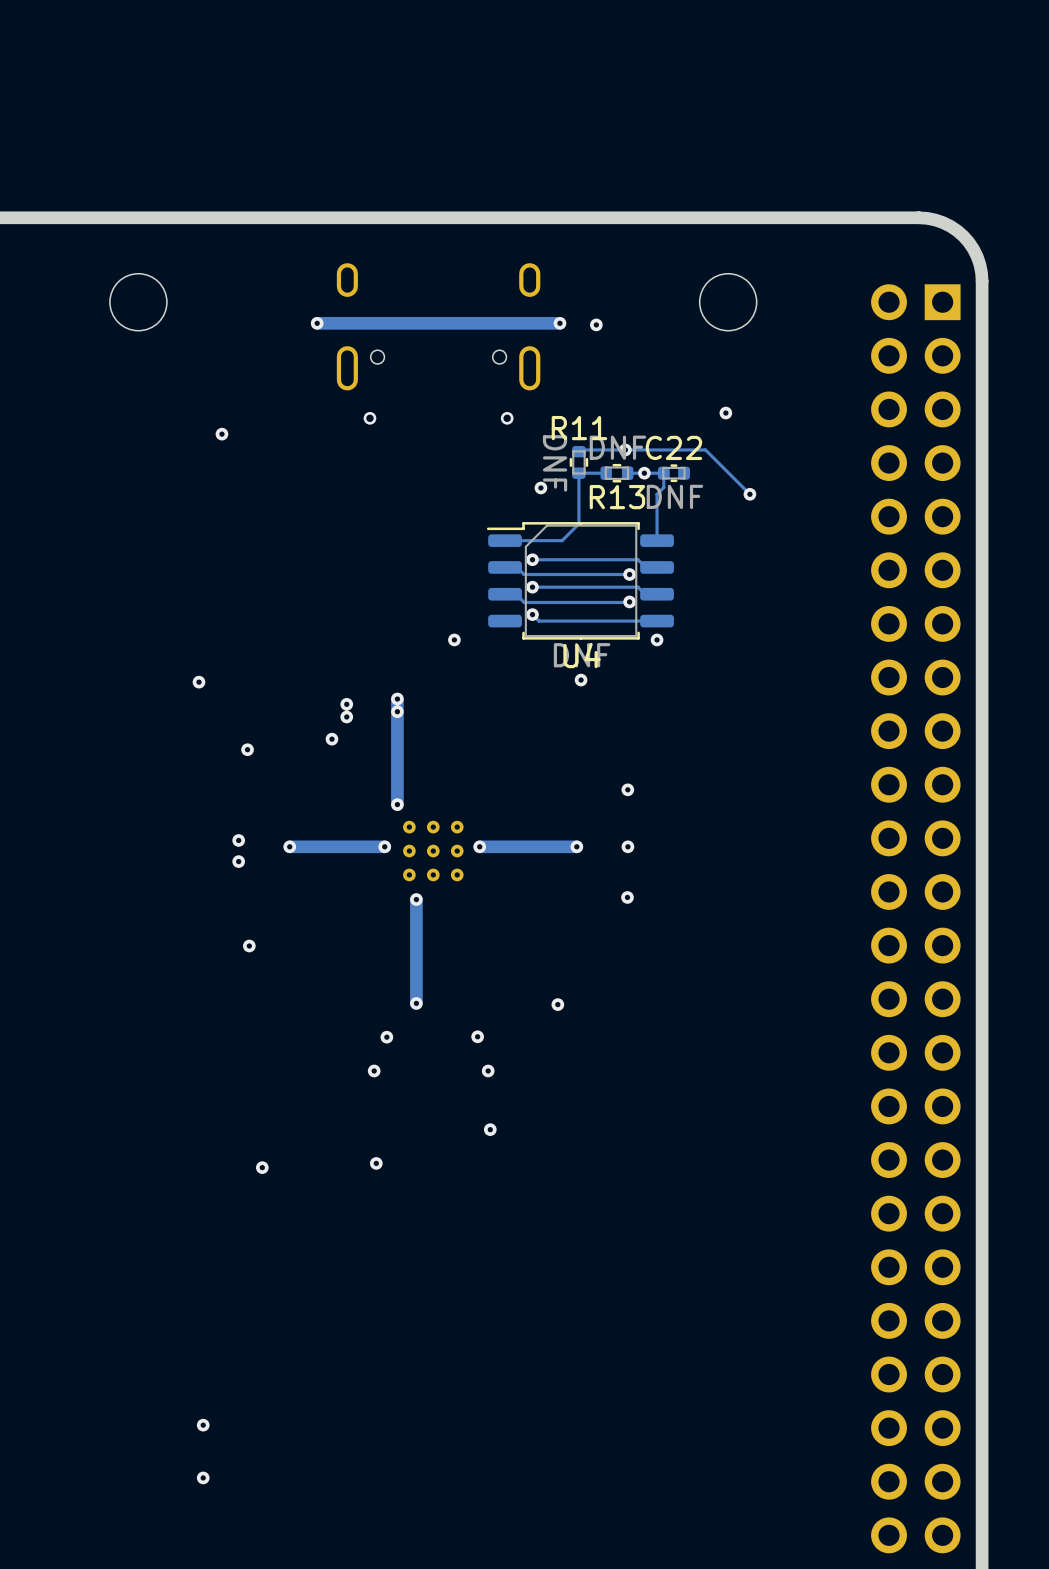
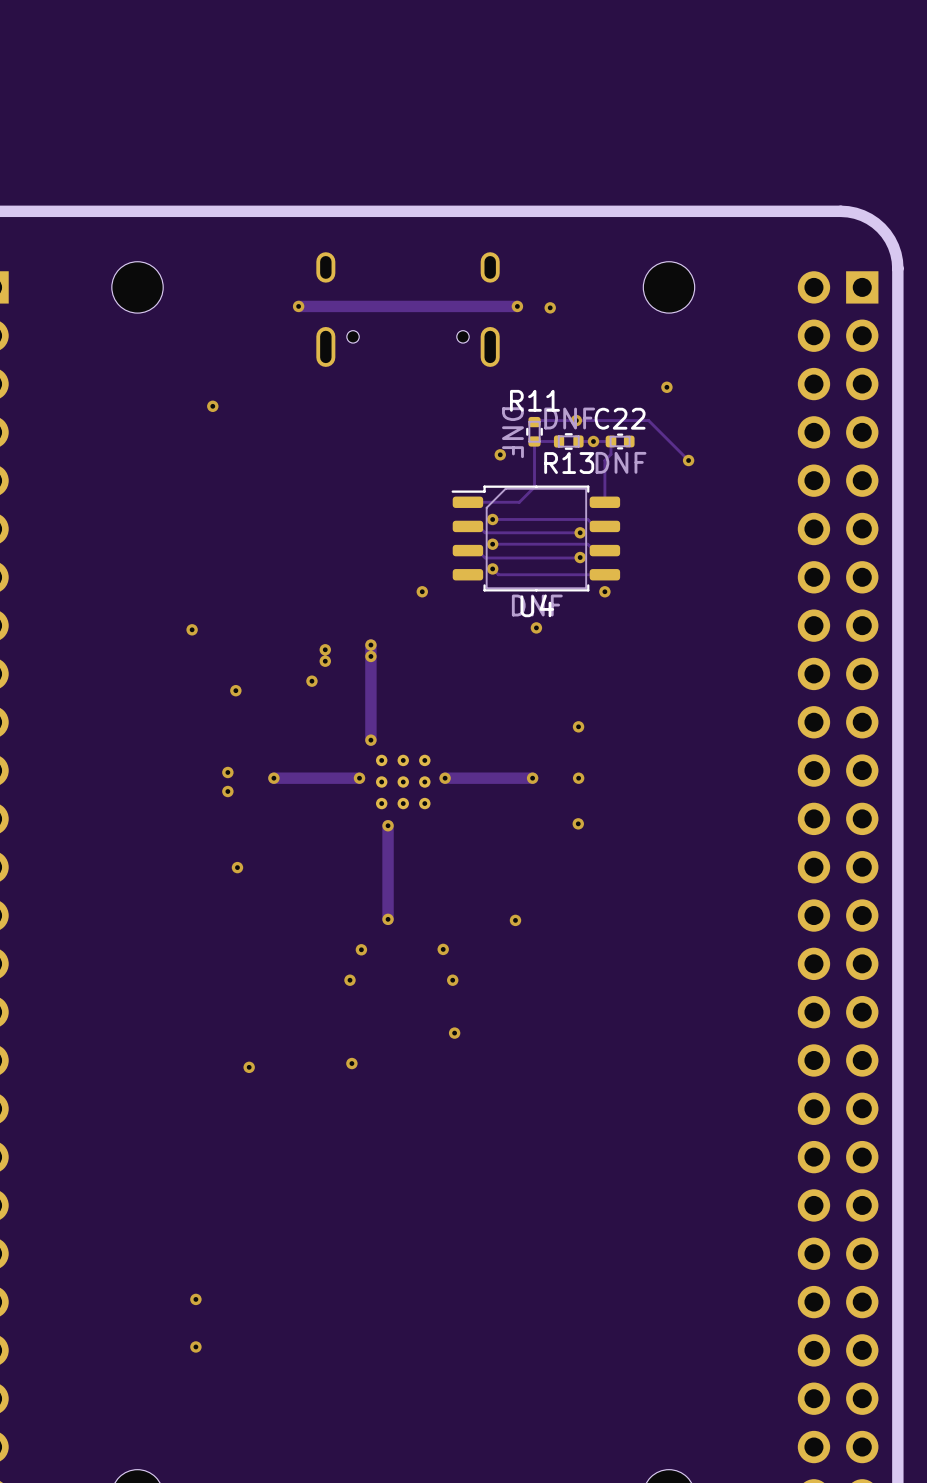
via: (369, 418) -> none
via: (507, 418) -> none

